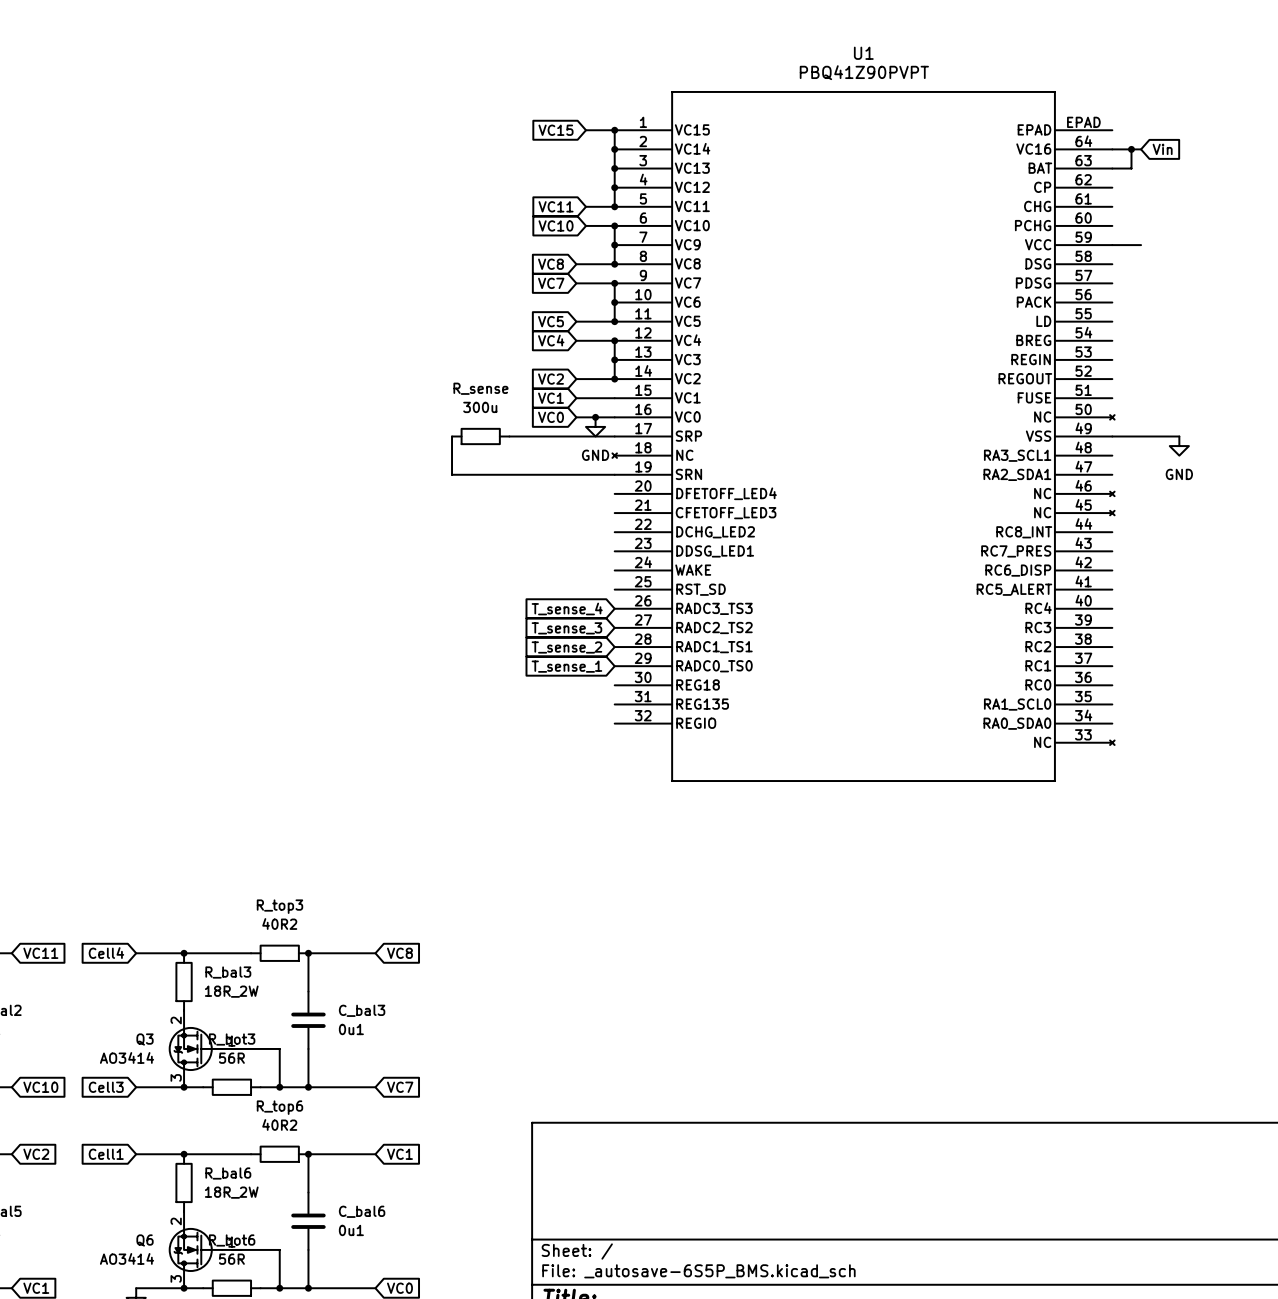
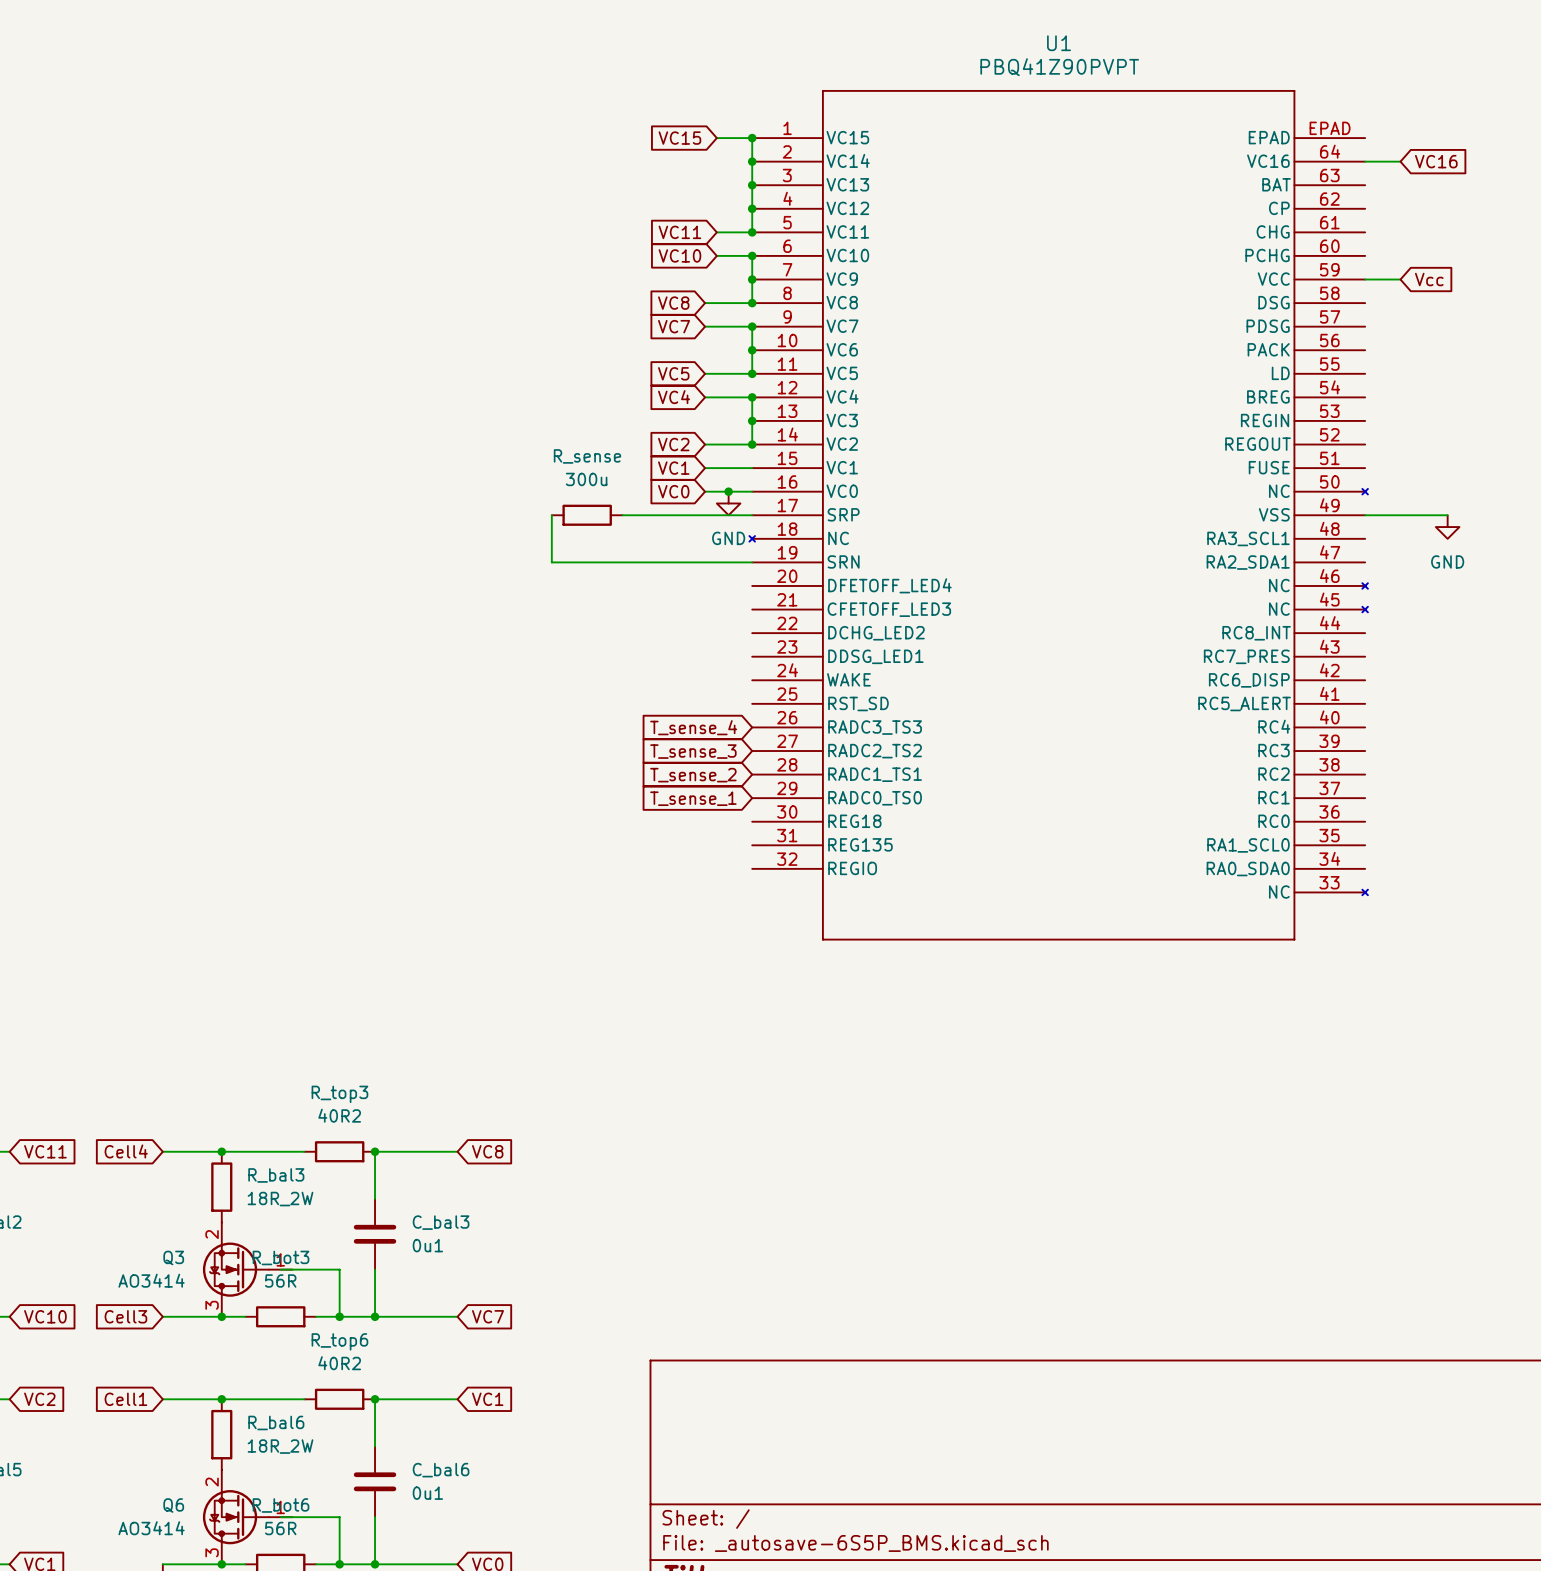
wire: (1131, 149) (1131, 168) (1112, 168) -> none
junction: (1131, 149) -> none
global label: Vin (1162, 149) -> VC16 (1436, 161)
global label: none -> Vcc (1429, 279)

